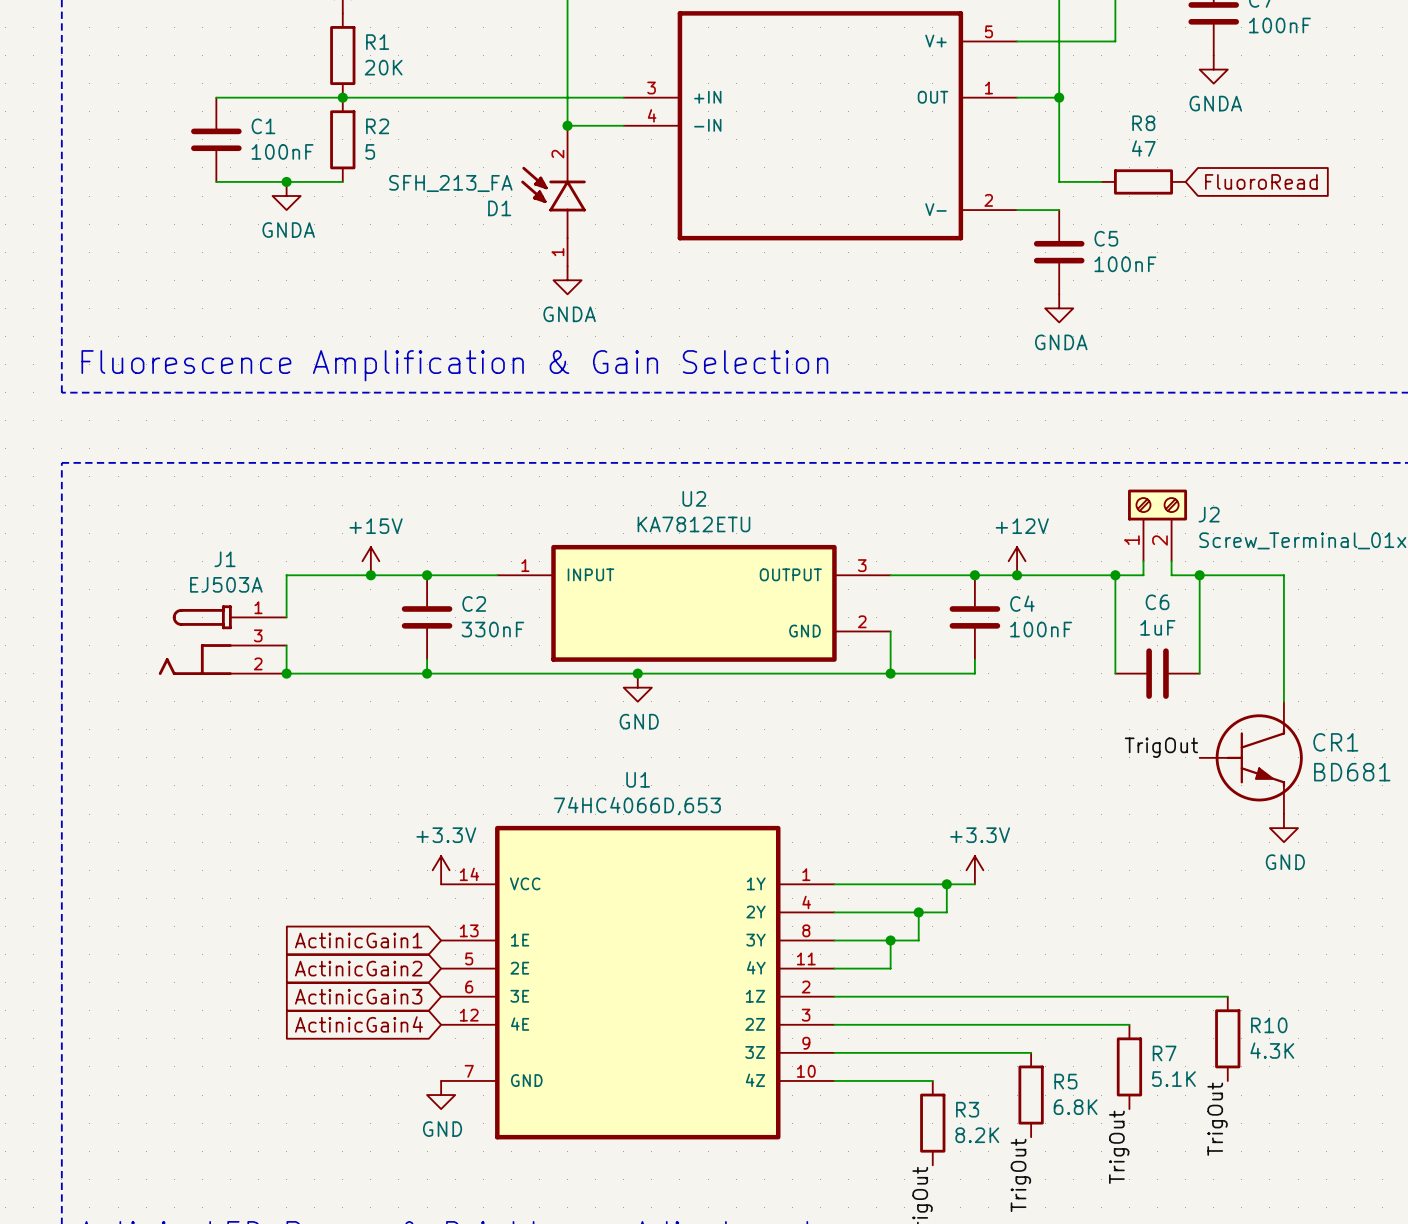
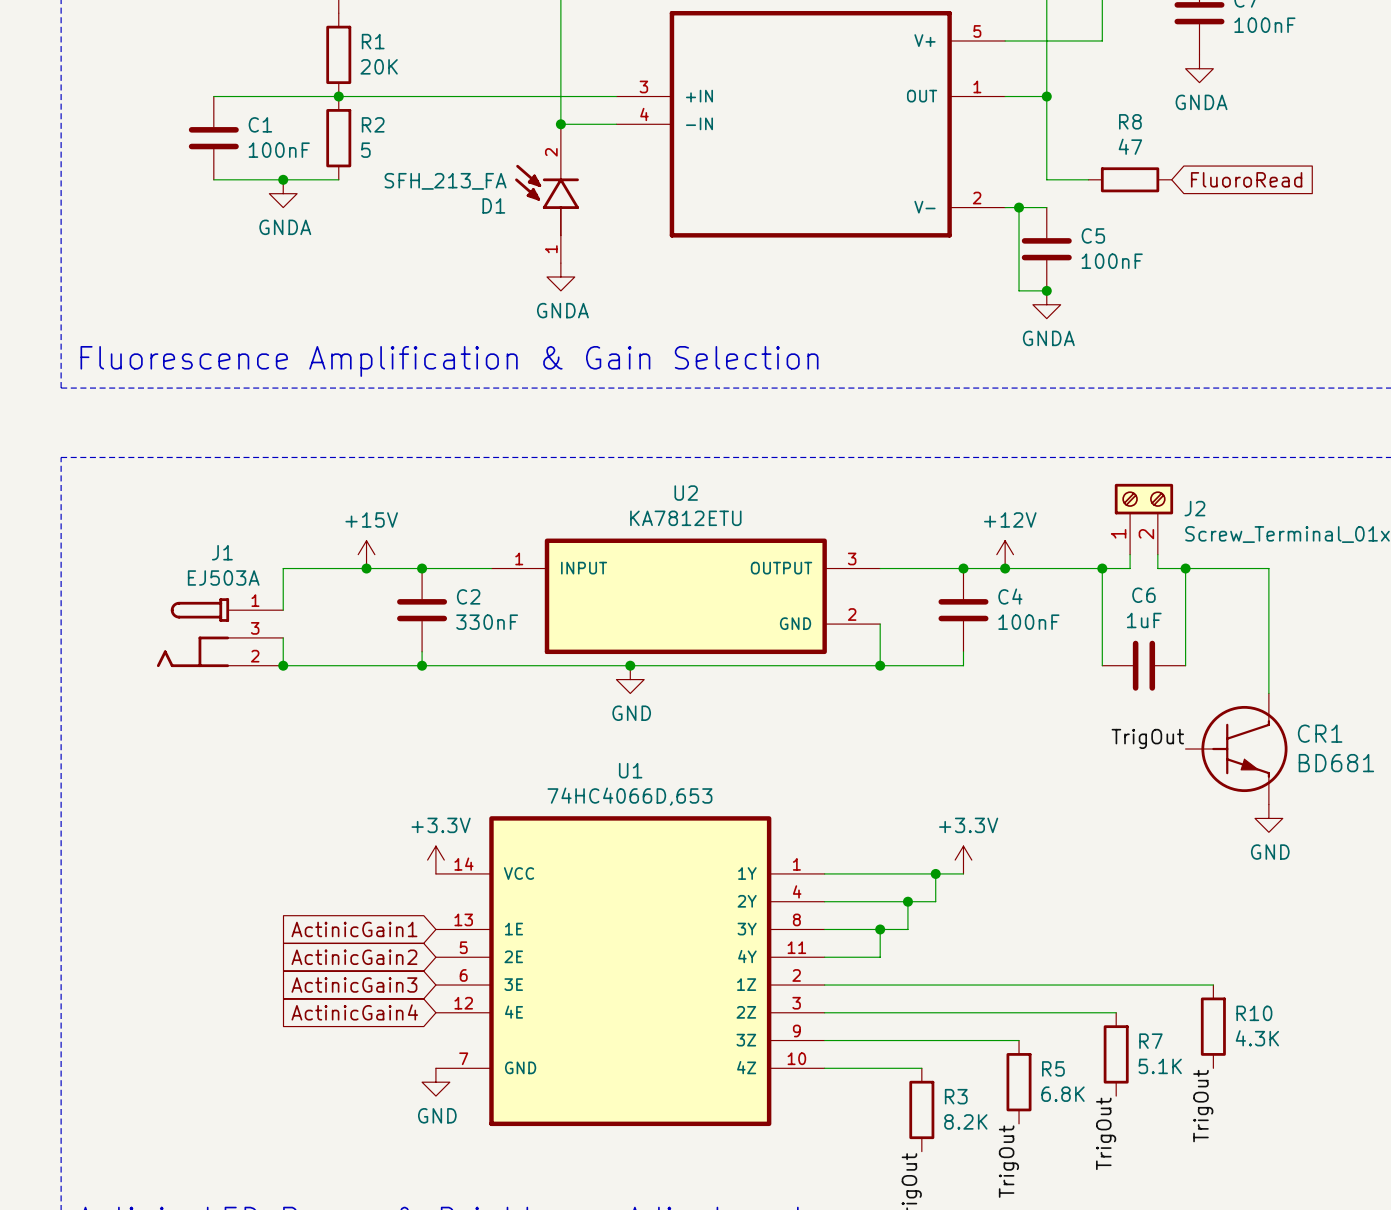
wire: none -> (1019, 207) (1019, 290) (1046, 290)
junction: none -> (1019, 207)
junction: none -> (1046, 290)

